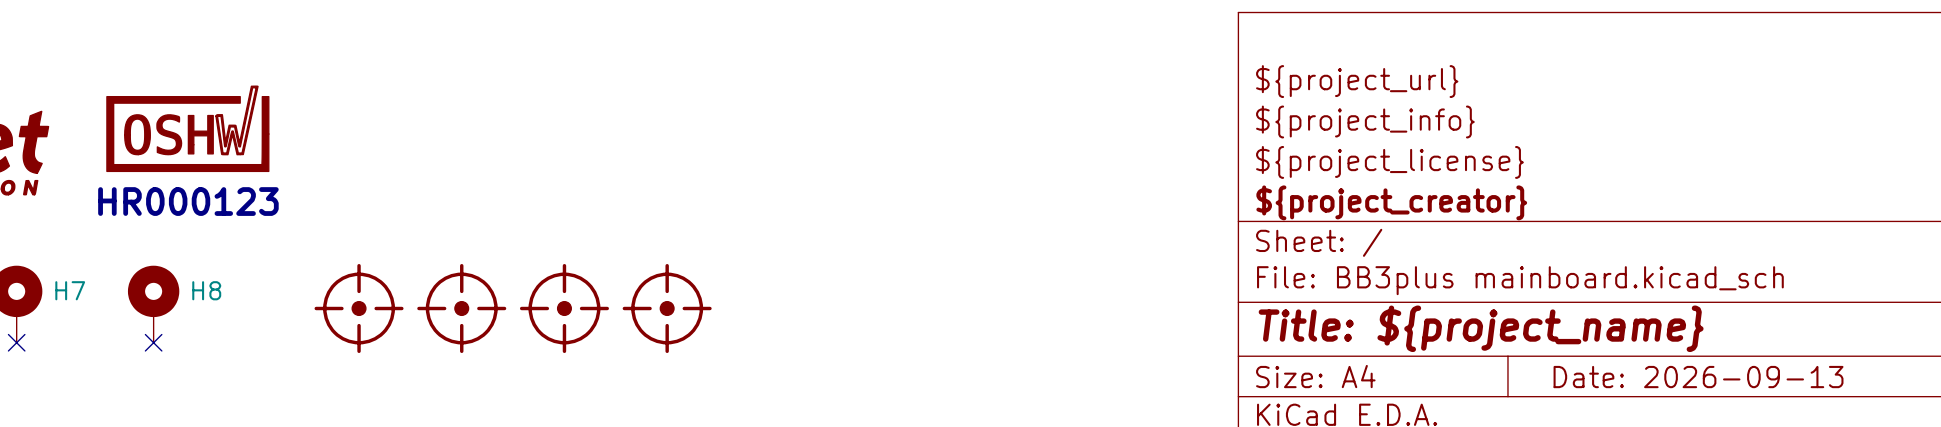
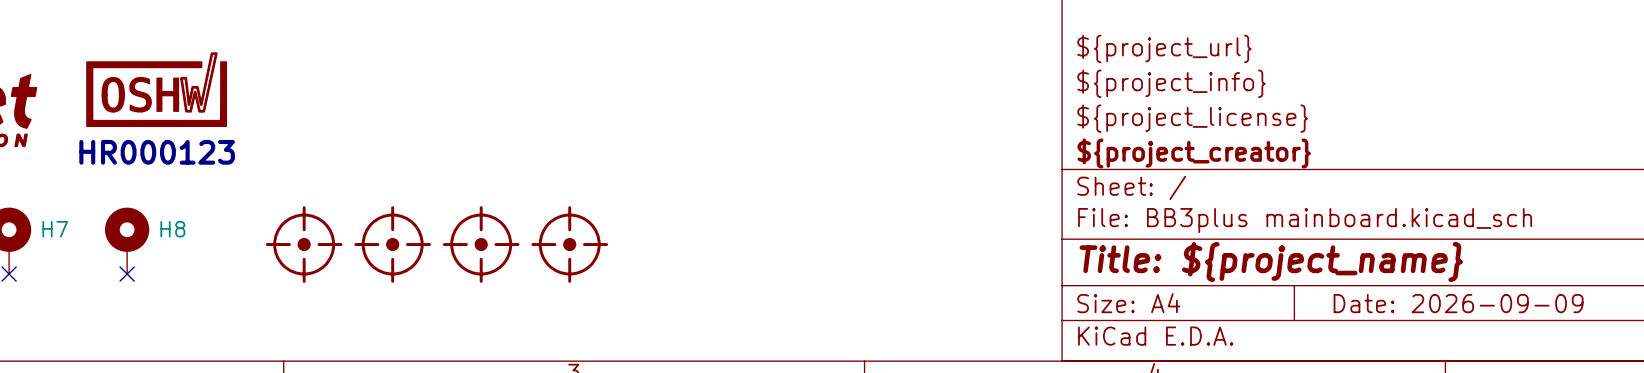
title block: Date: 2026-09-13 (1698, 377) -> Date: 2026-09-09 (1458, 303)

